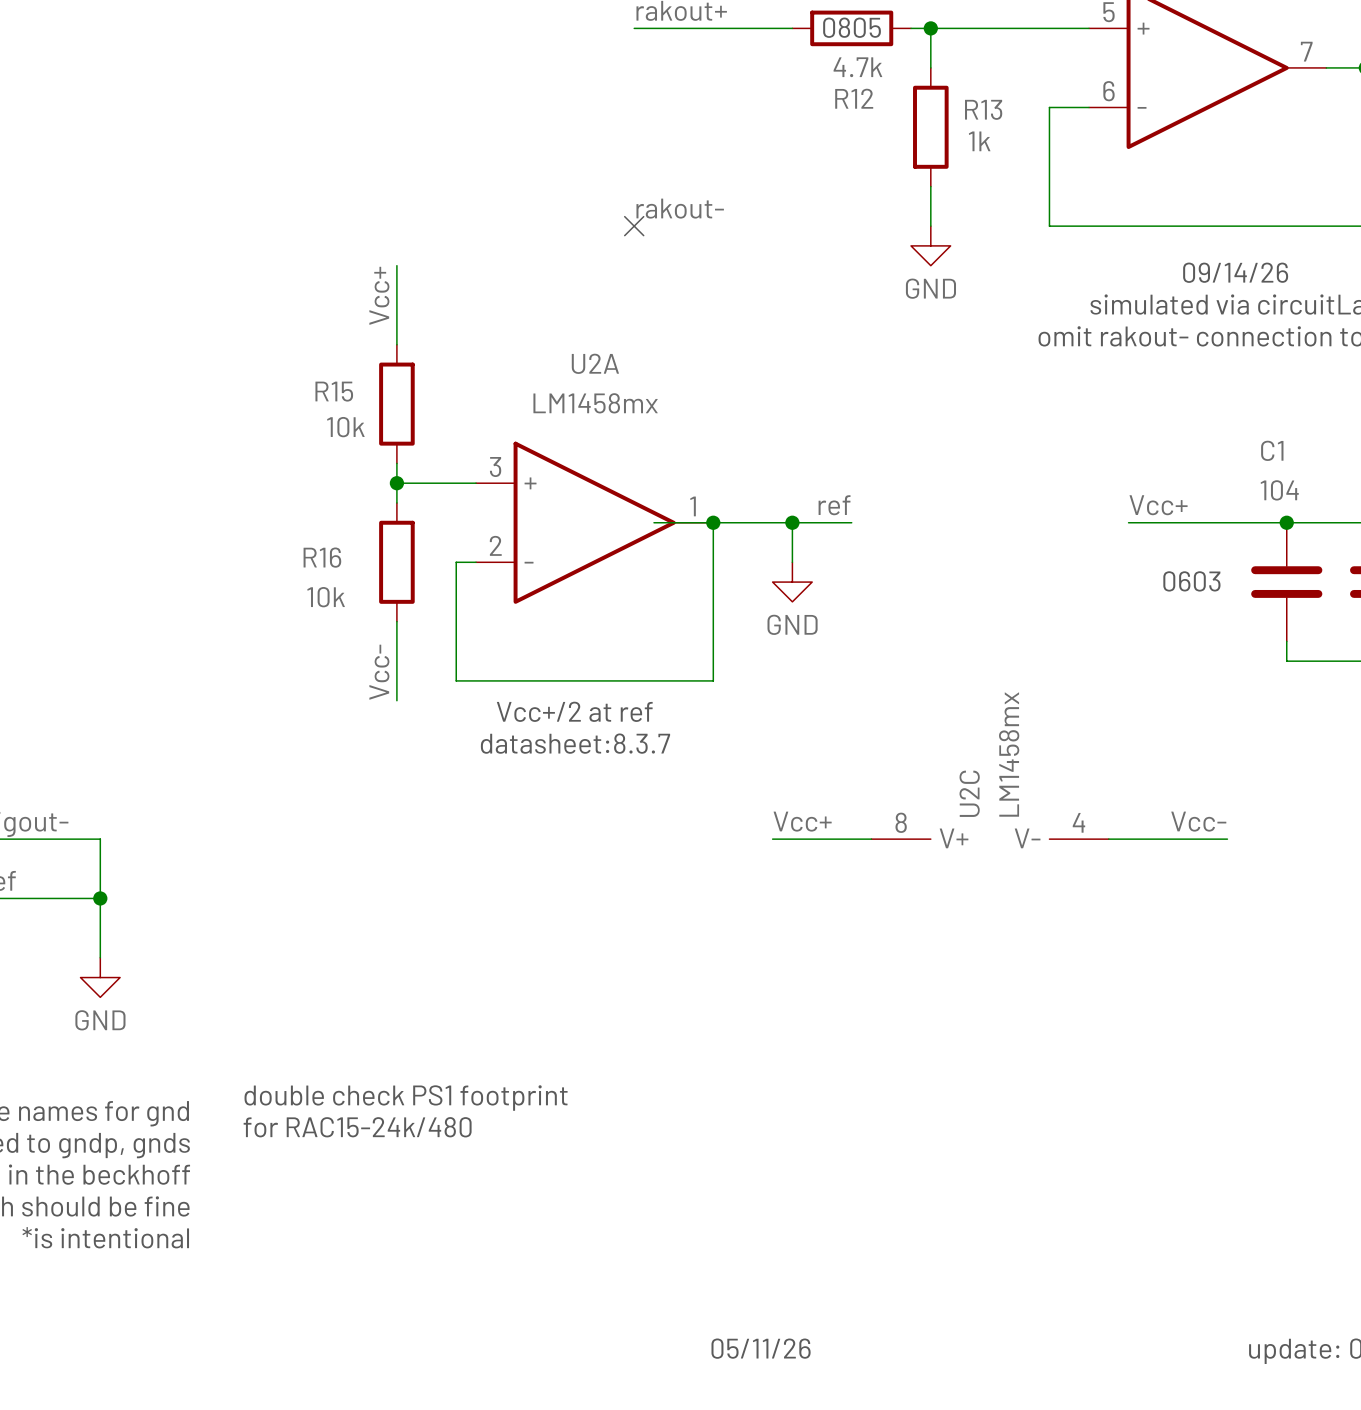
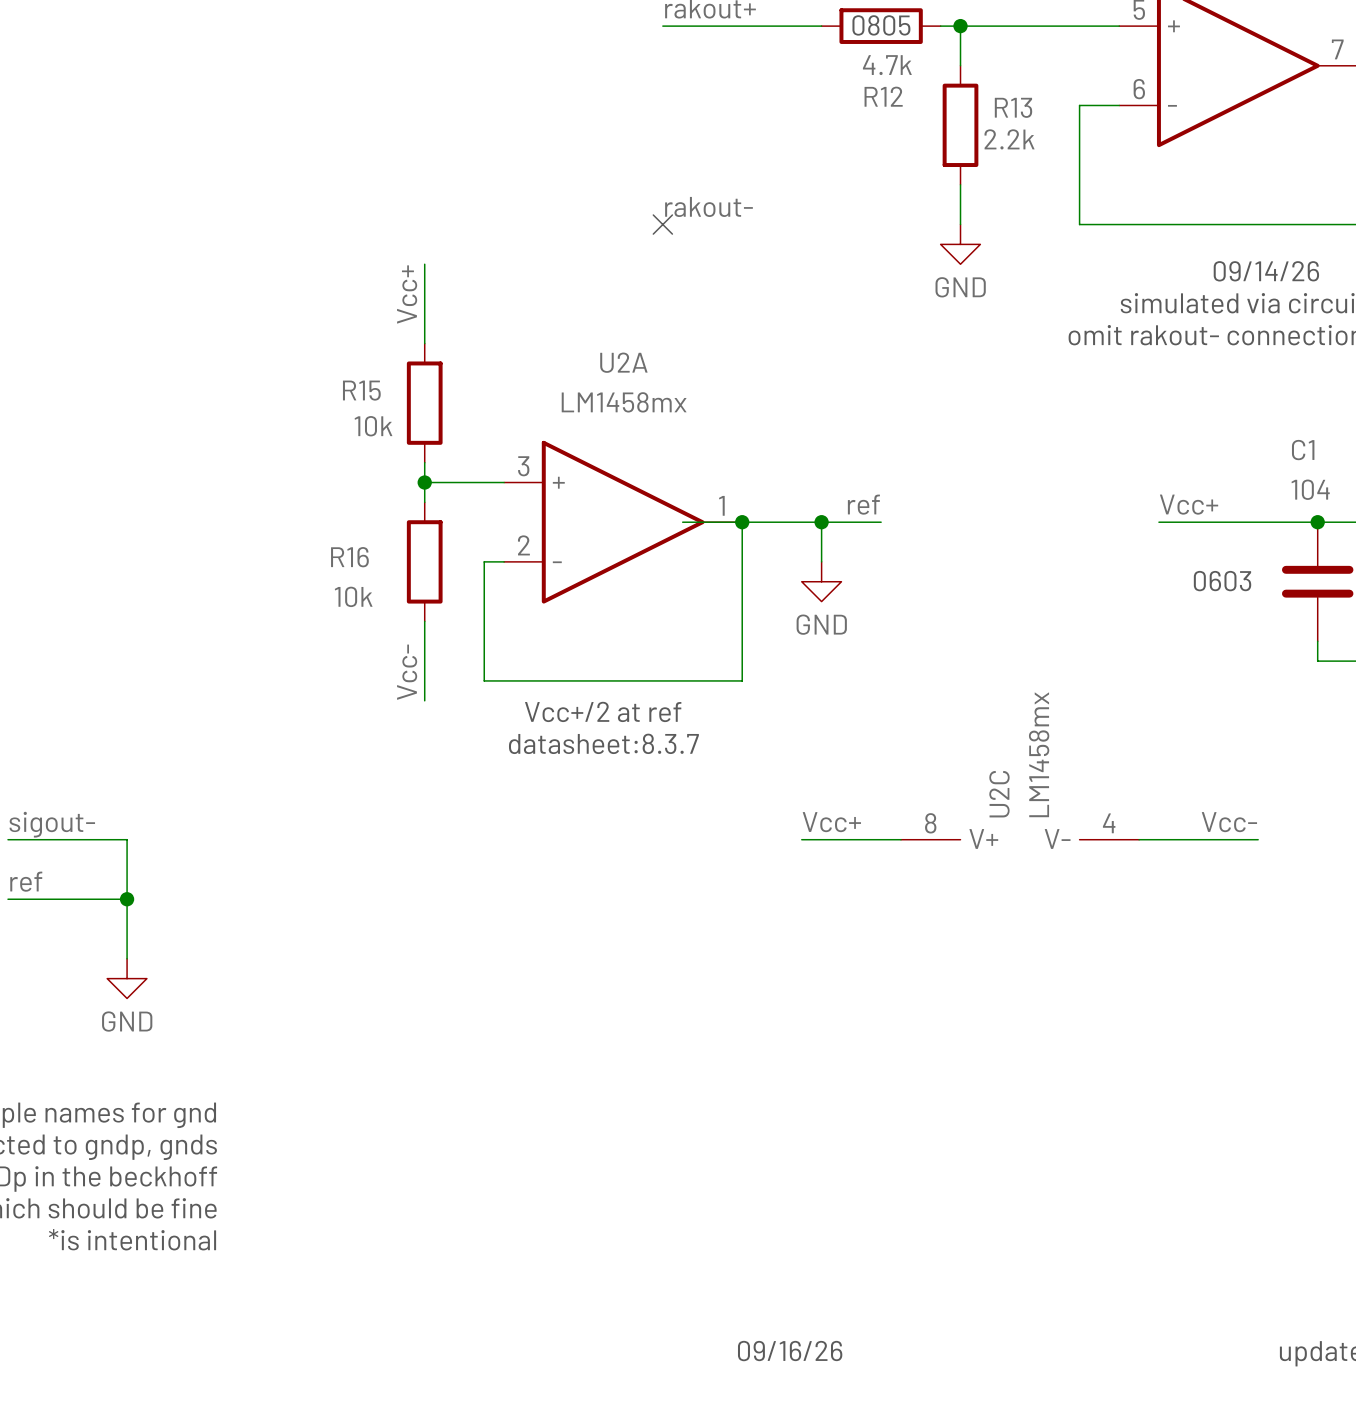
R13 value: 1k (979, 141) -> 2.2k (1009, 139)
text: double check PS1 footprint (406, 1098) -> none
text: for RAC15-24k/480 (357, 1127) -> none
text: 05/11/26 (761, 1348) -> 09/16/26 (790, 1351)

